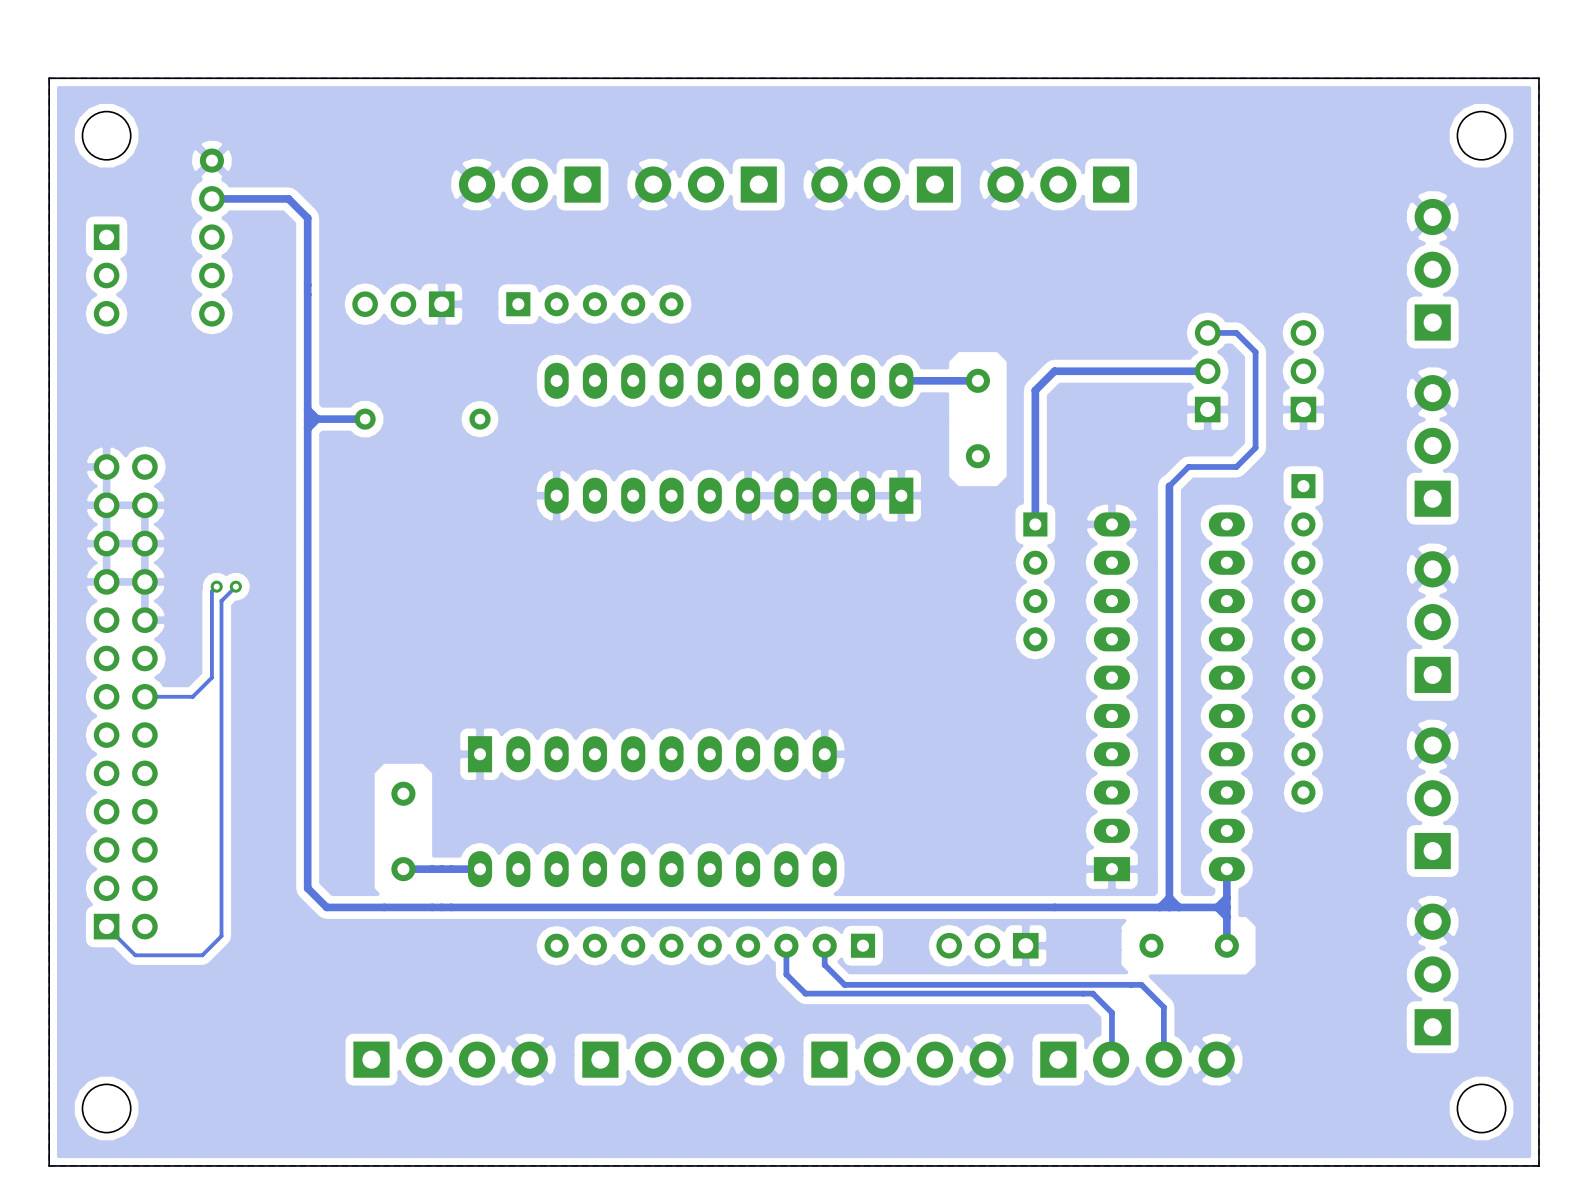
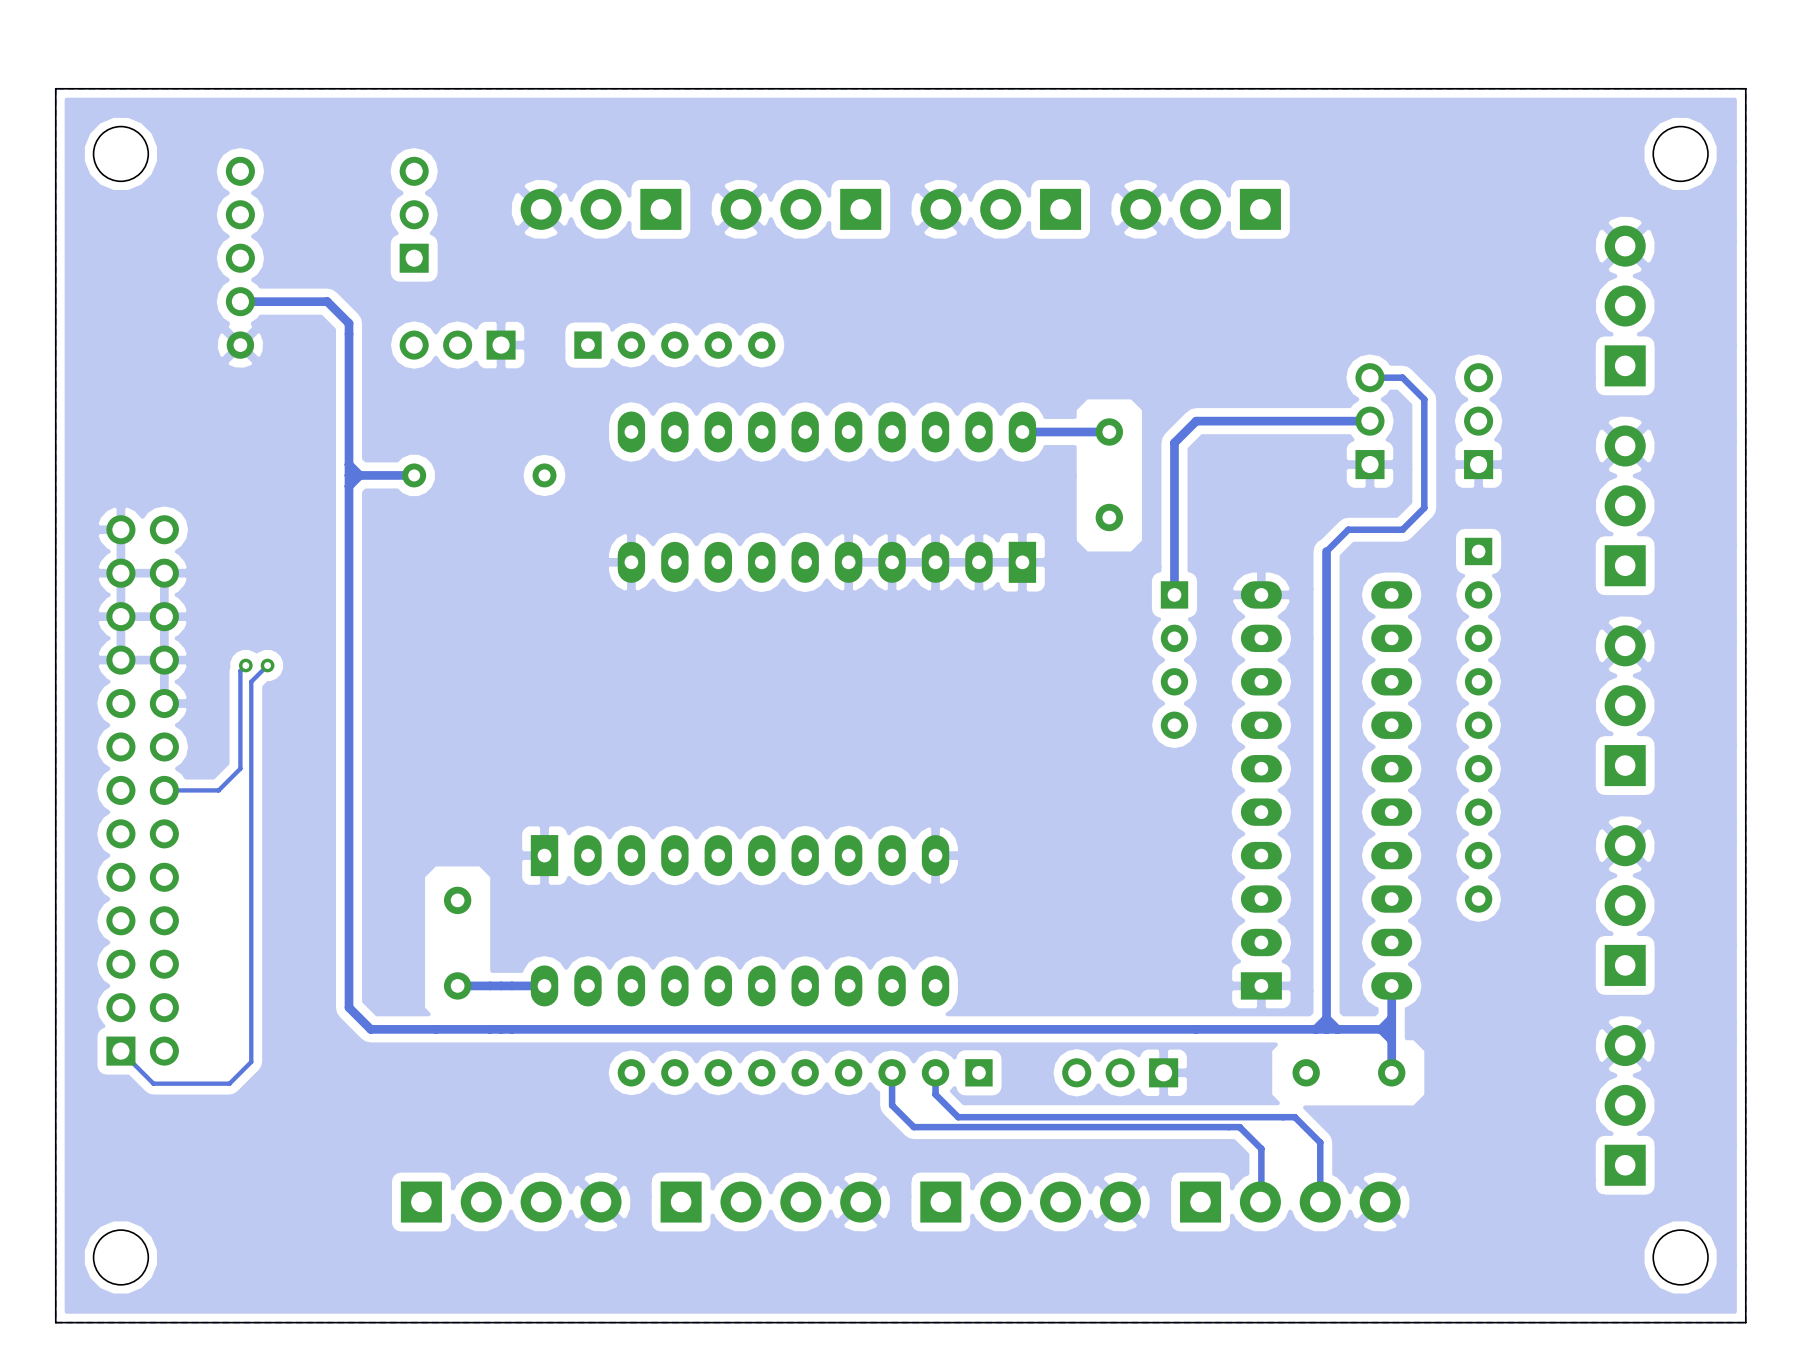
track: (211, 198) (288, 198) (307, 218) (307, 285) -> (240, 301) (327, 301) (349, 323)
part rotation: 0° (211, 237) -> 180° (240, 257)
part rotation: 0° (106, 275) -> 180° (414, 214)
part position: (106, 275) -> (414, 214)

